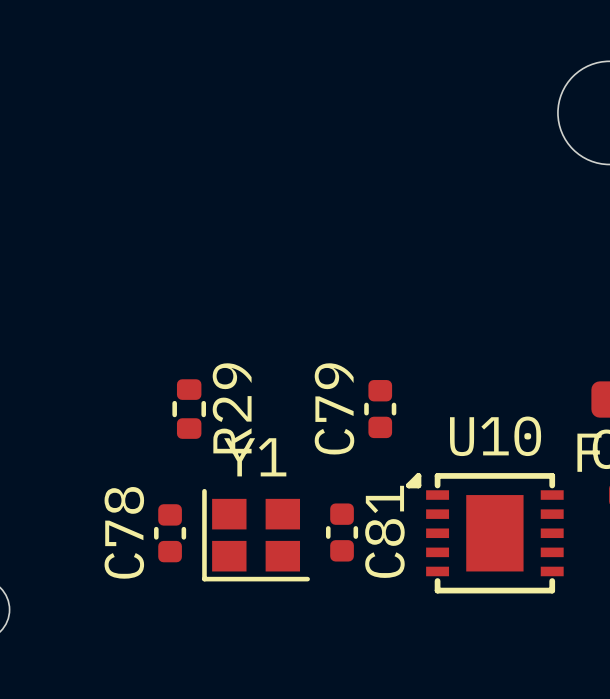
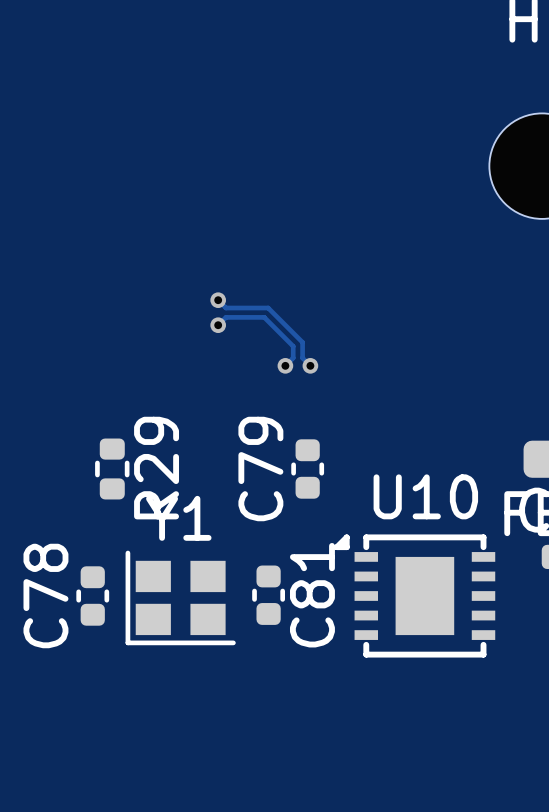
track: none -> (218, 300) (226, 308) (268, 308) (302, 342) (302, 358) (310, 365)
via: none -> (218, 300)
track: none -> (218, 325) (226, 317) (264, 317) (293, 346) (293, 358) (285, 365)
via: none -> (218, 325)
via: none -> (285, 365)
via: none -> (310, 365)

